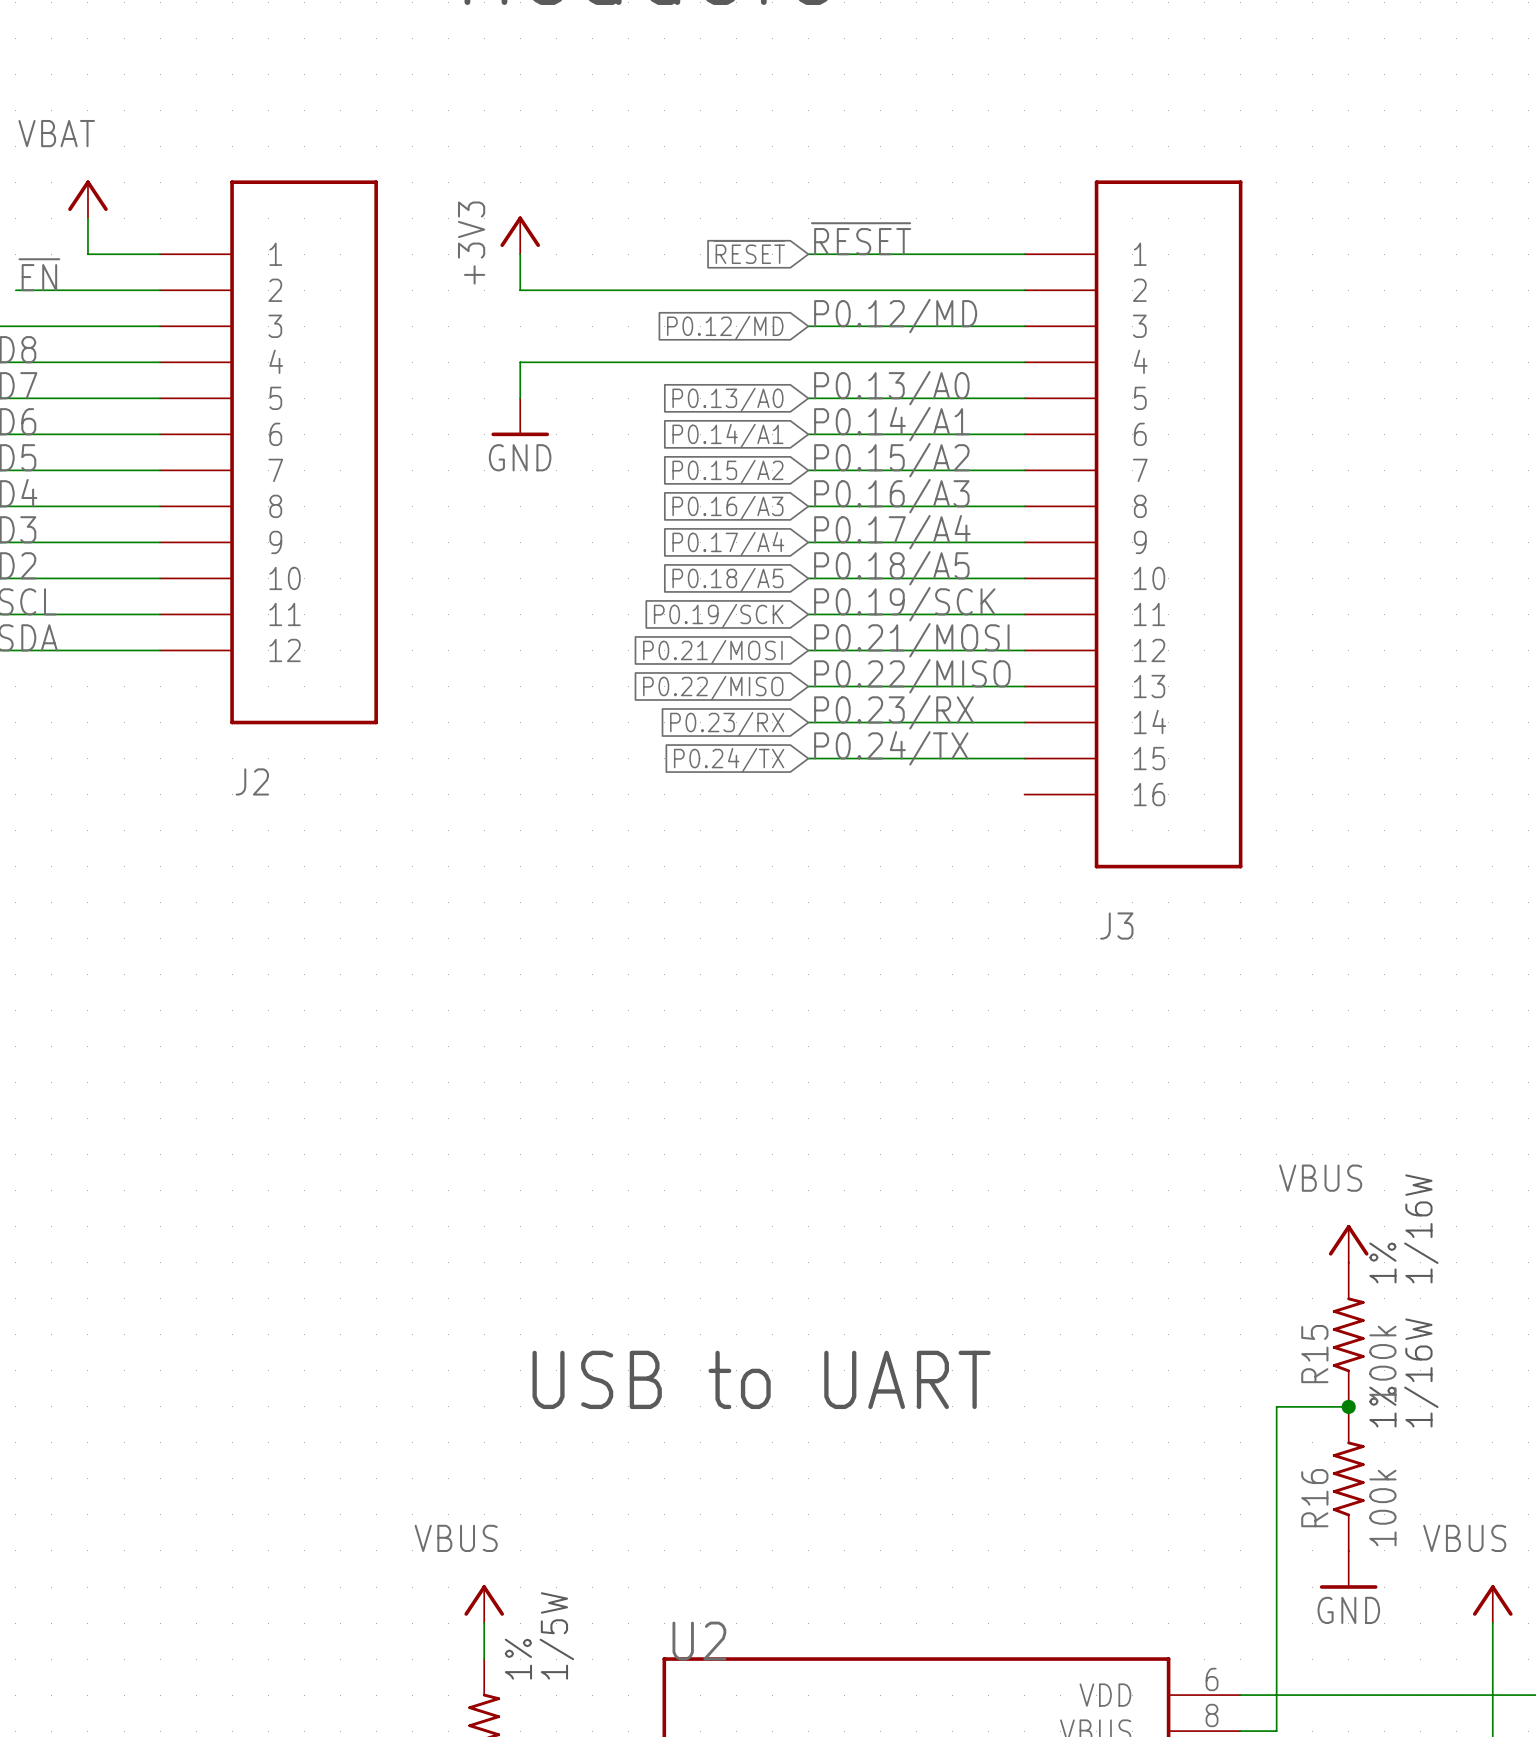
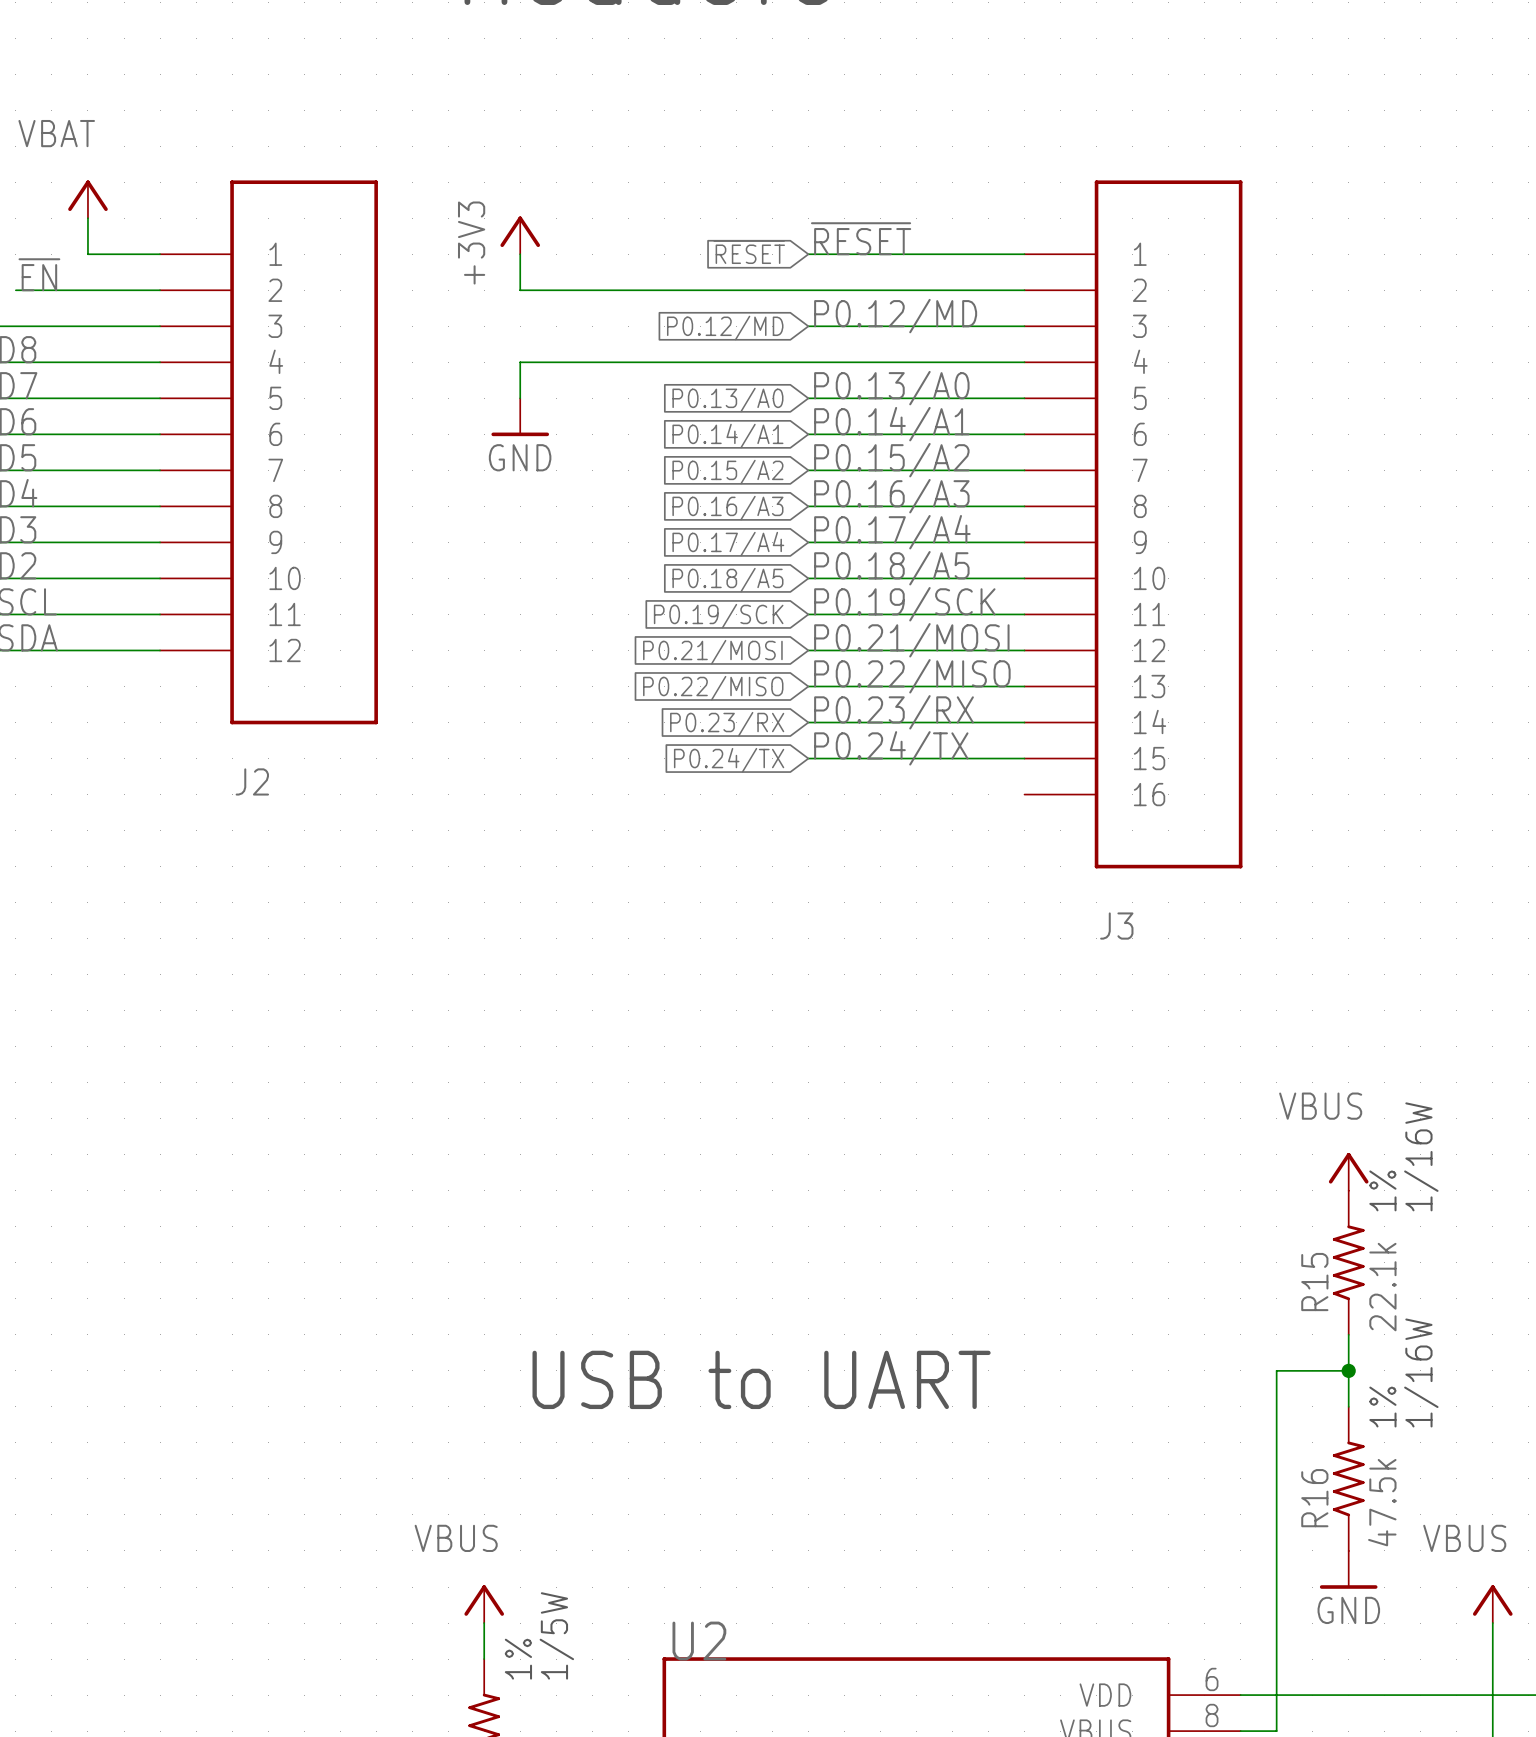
power symbol position: VBUS (1348, 1243) -> VBUS (1348, 1171)
R15 position: (1348, 1334) -> (1348, 1262)
R15 value: 100k (1382, 1363) -> 22.1k (1382, 1287)
wire: (1276, 1406) (1348, 1406) -> (1276, 1406) (1276, 1370) (1348, 1370)
junction position: (1348, 1406) -> (1348, 1370)
R16 value: 100k (1382, 1508) -> 47.5k (1382, 1502)

